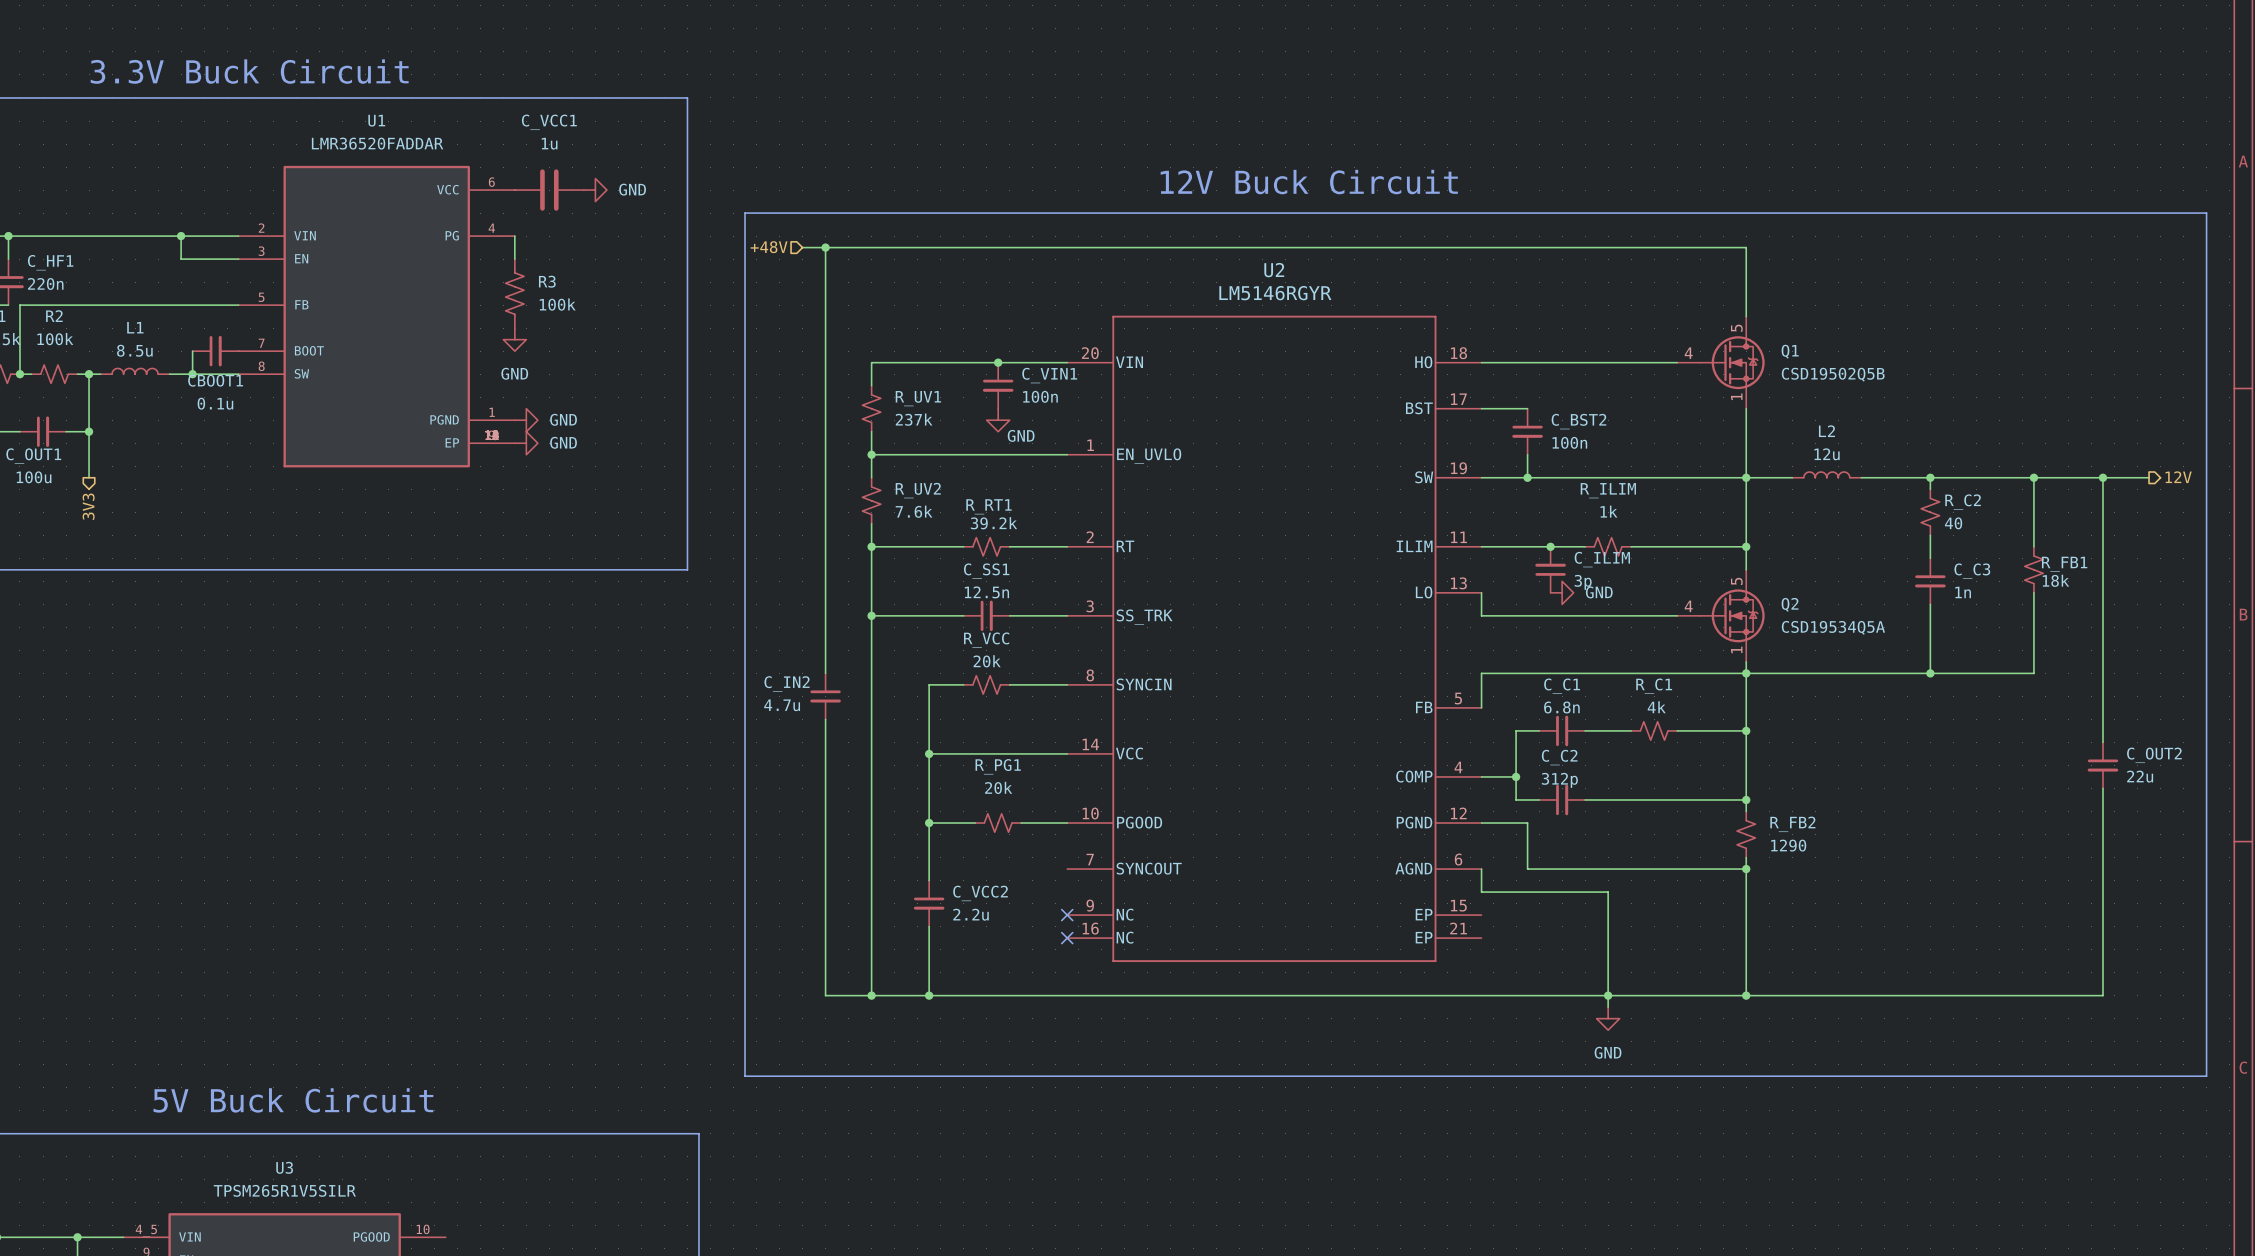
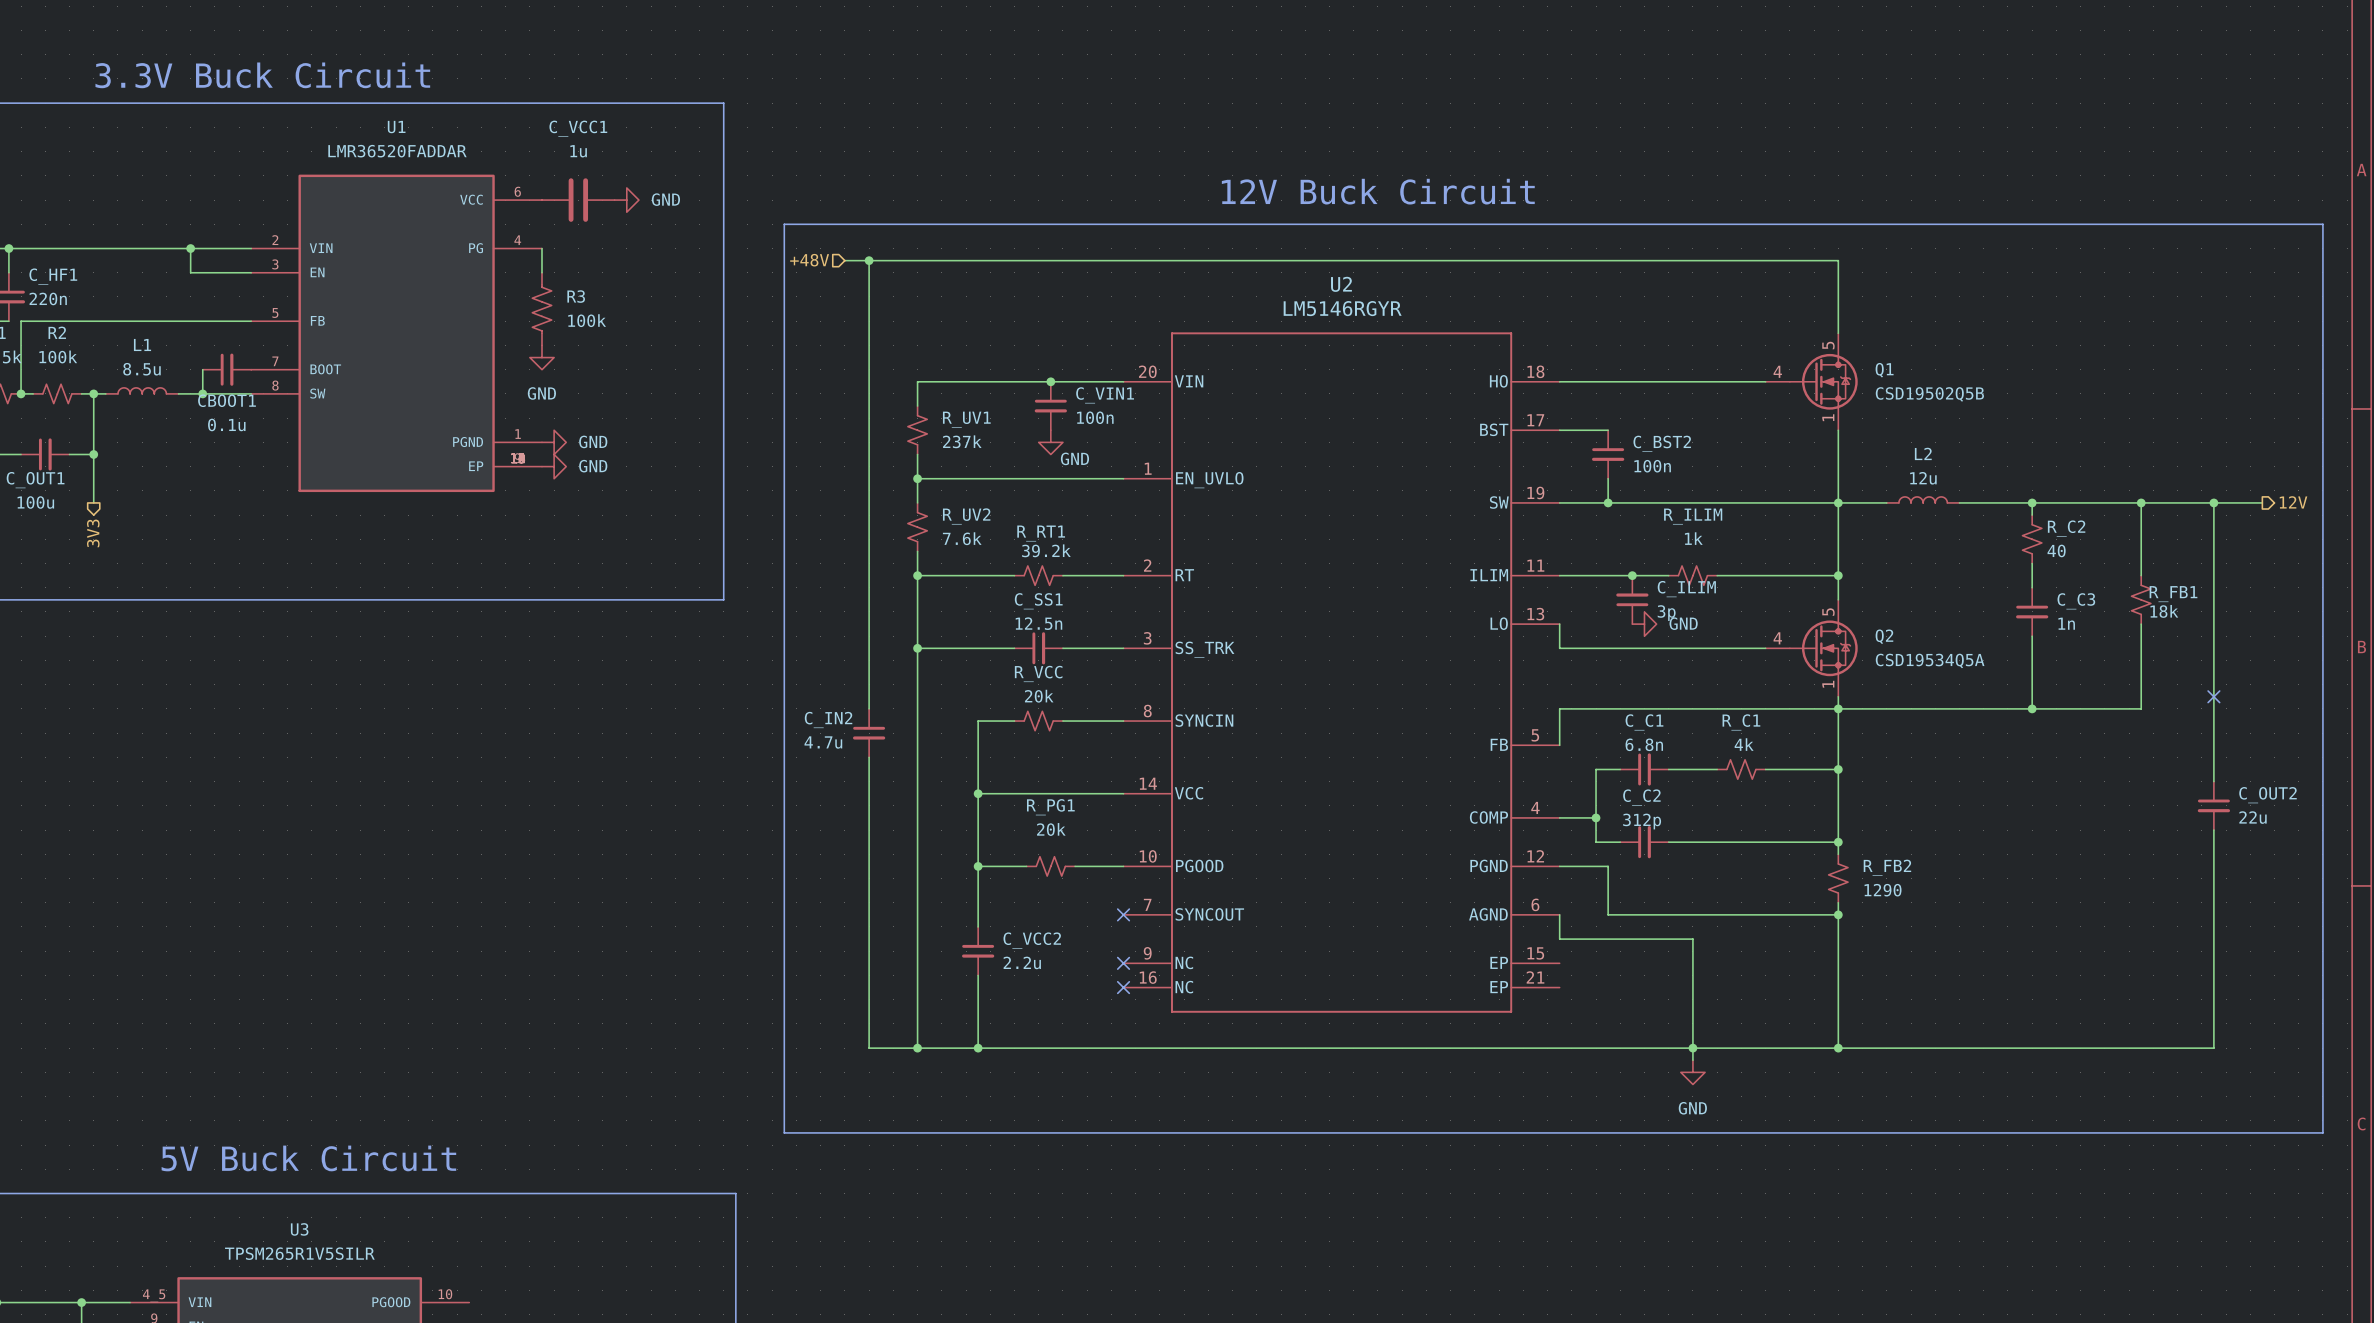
no-connect mark: none -> (2213, 696)
no-connect mark: none -> (1123, 914)

